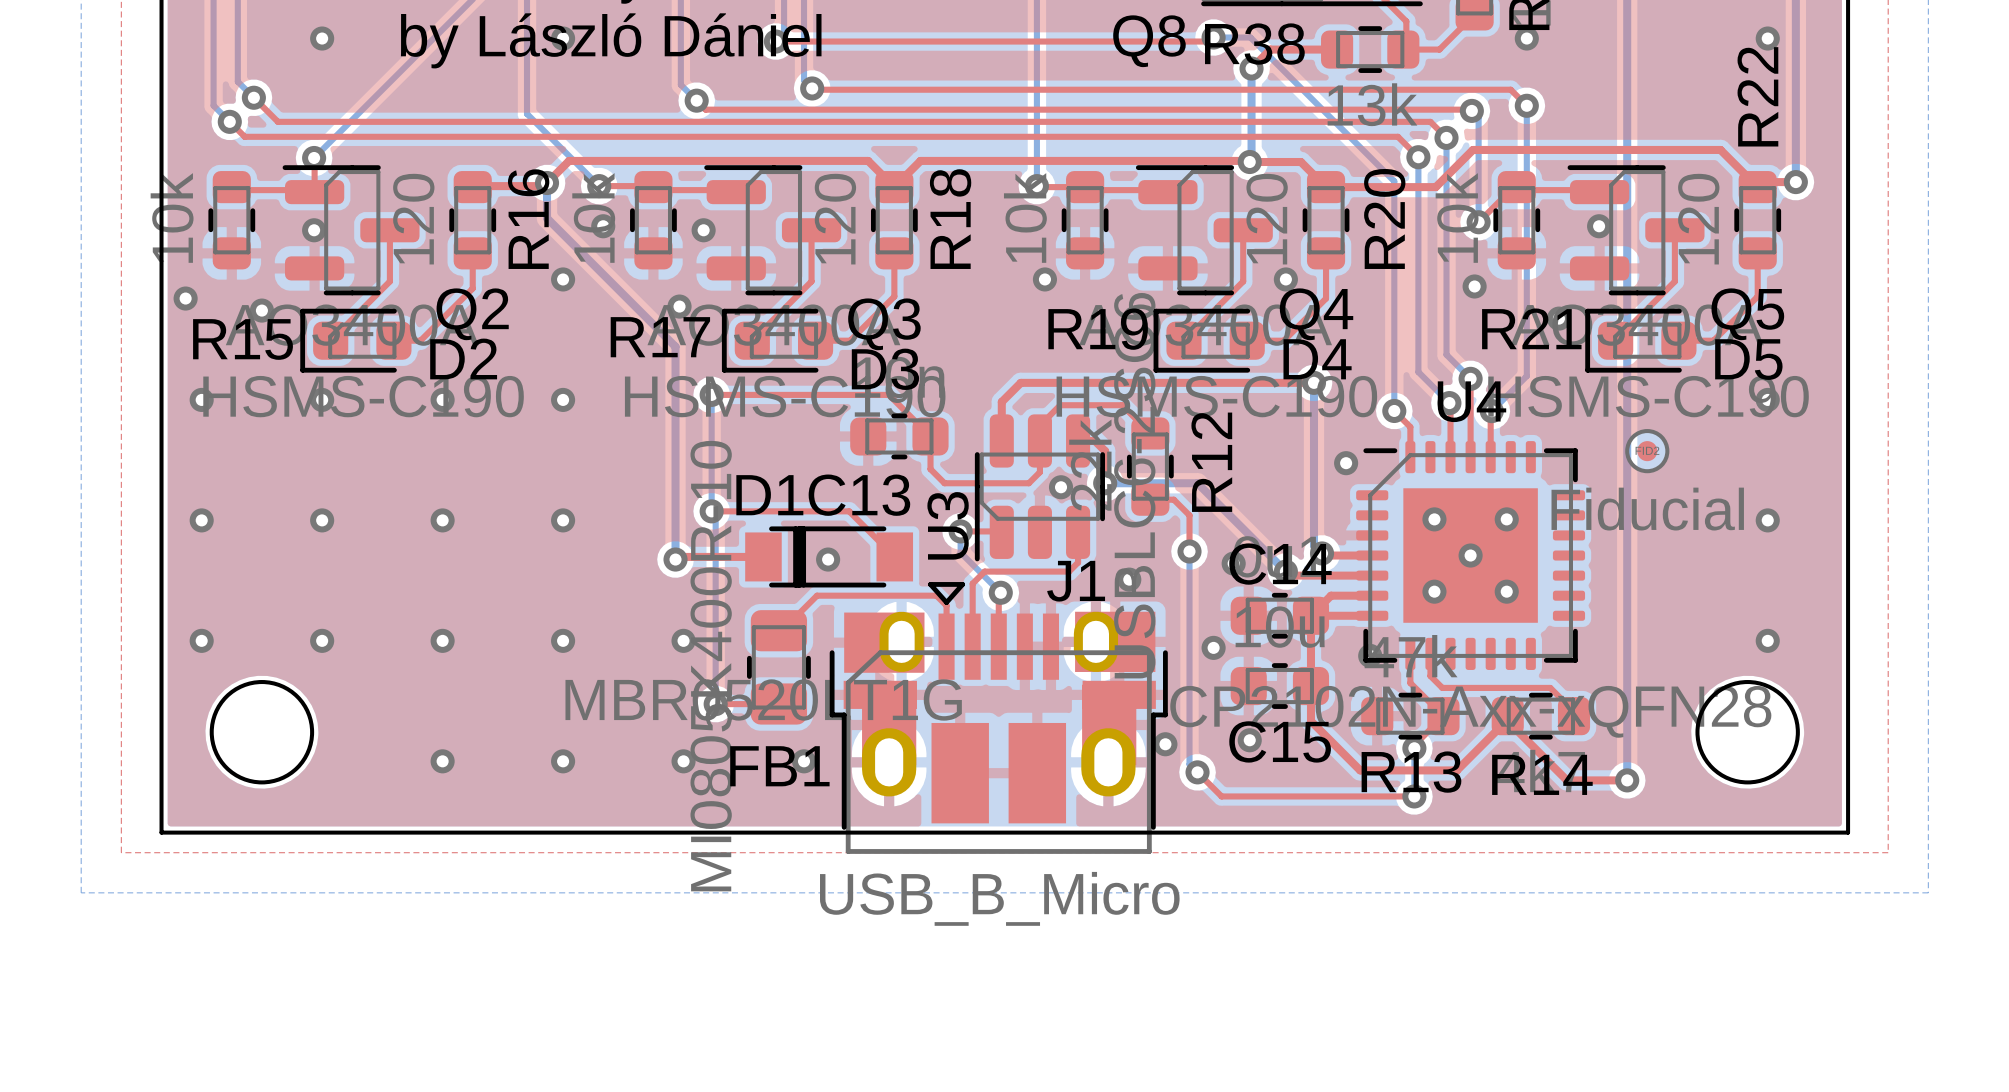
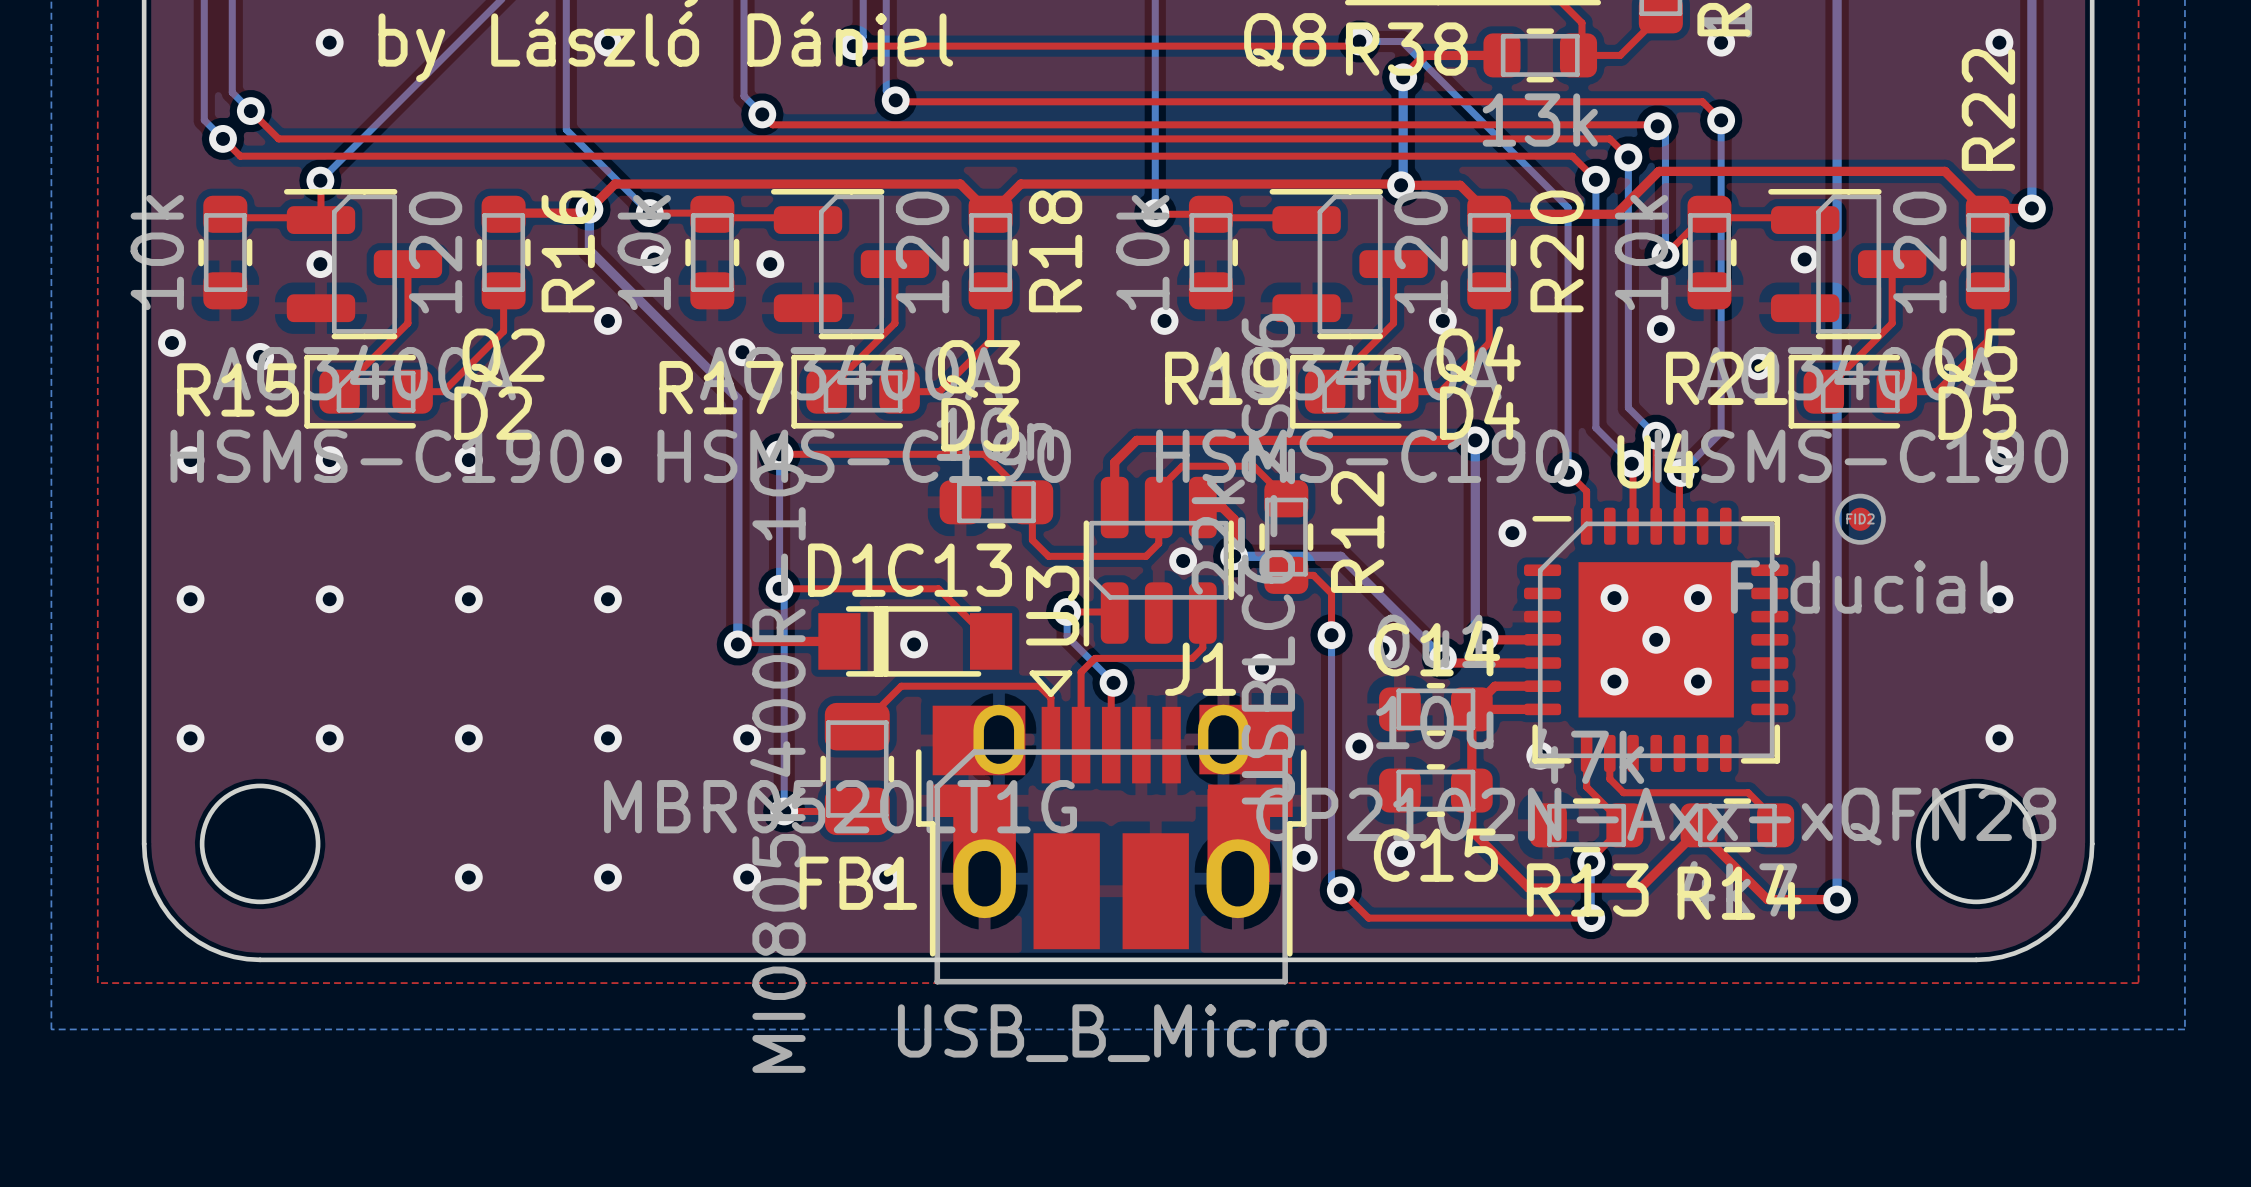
board edge: (161, 732) (161, 832) (261, 832) -> (144, 843) (147, 869) (155, 894) (178, 925) (209, 948) (234, 956) (260, 959)
board edge: (1848, 732) (1848, 832) (1747, 832) -> (2092, 843) (2085, 882) (2074, 905) (2058, 925) (2037, 942) (2014, 953) (1976, 959)

